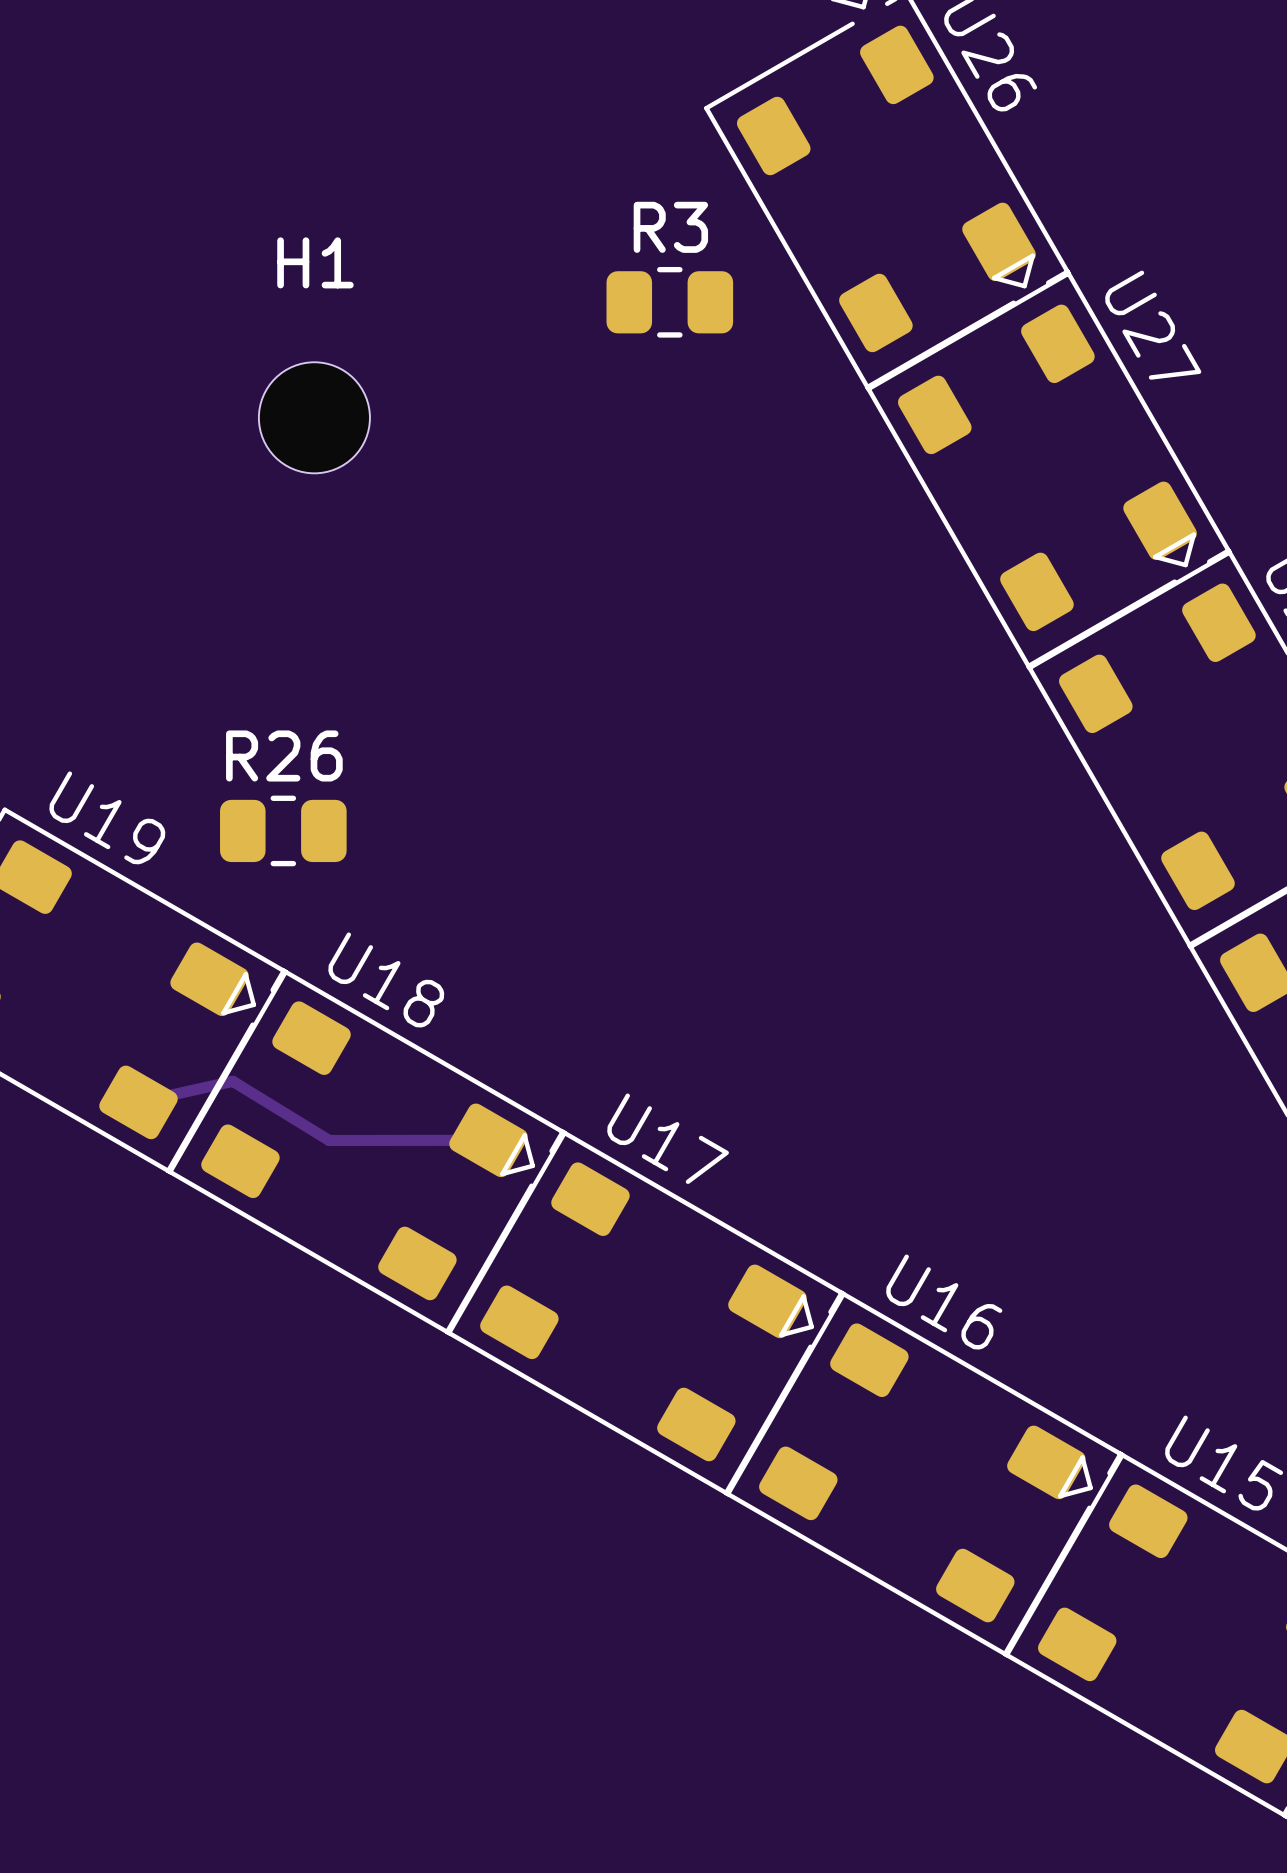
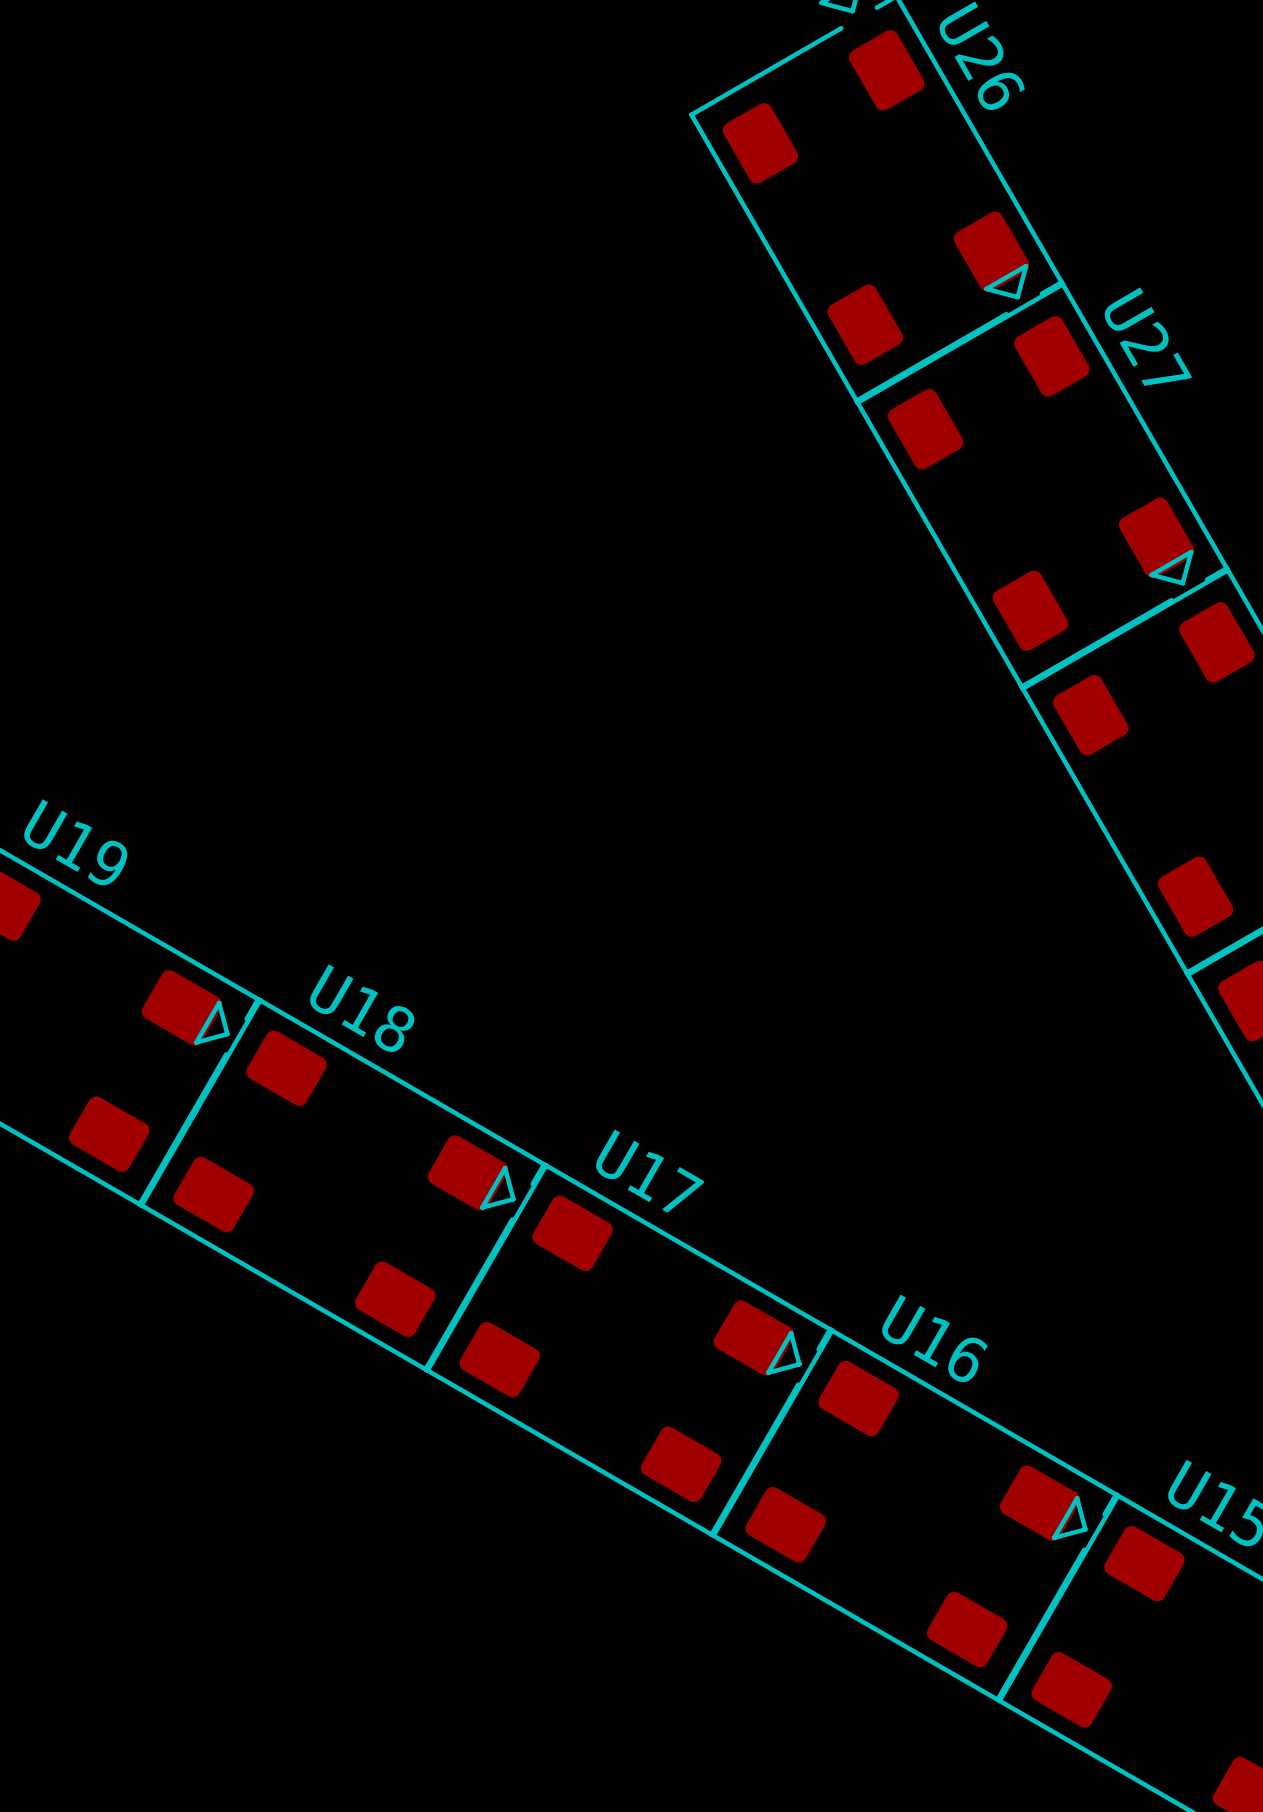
R3: (669, 302) -> none
H1: (314, 417) -> none
R26: (283, 830) -> none
track: (138, 1102) (232, 1081) (329, 1140) (488, 1140) -> none

